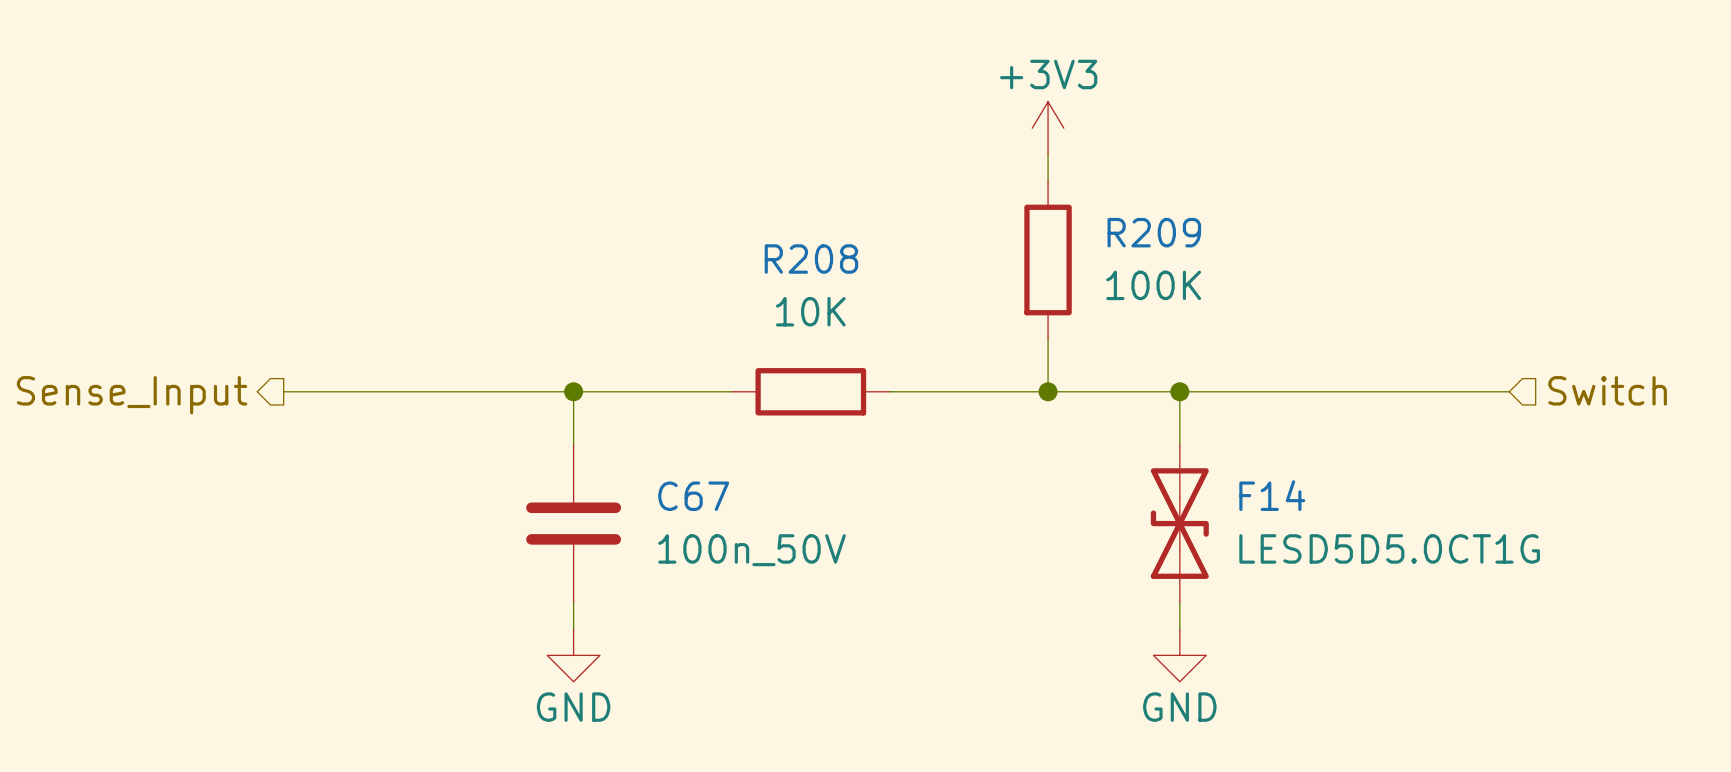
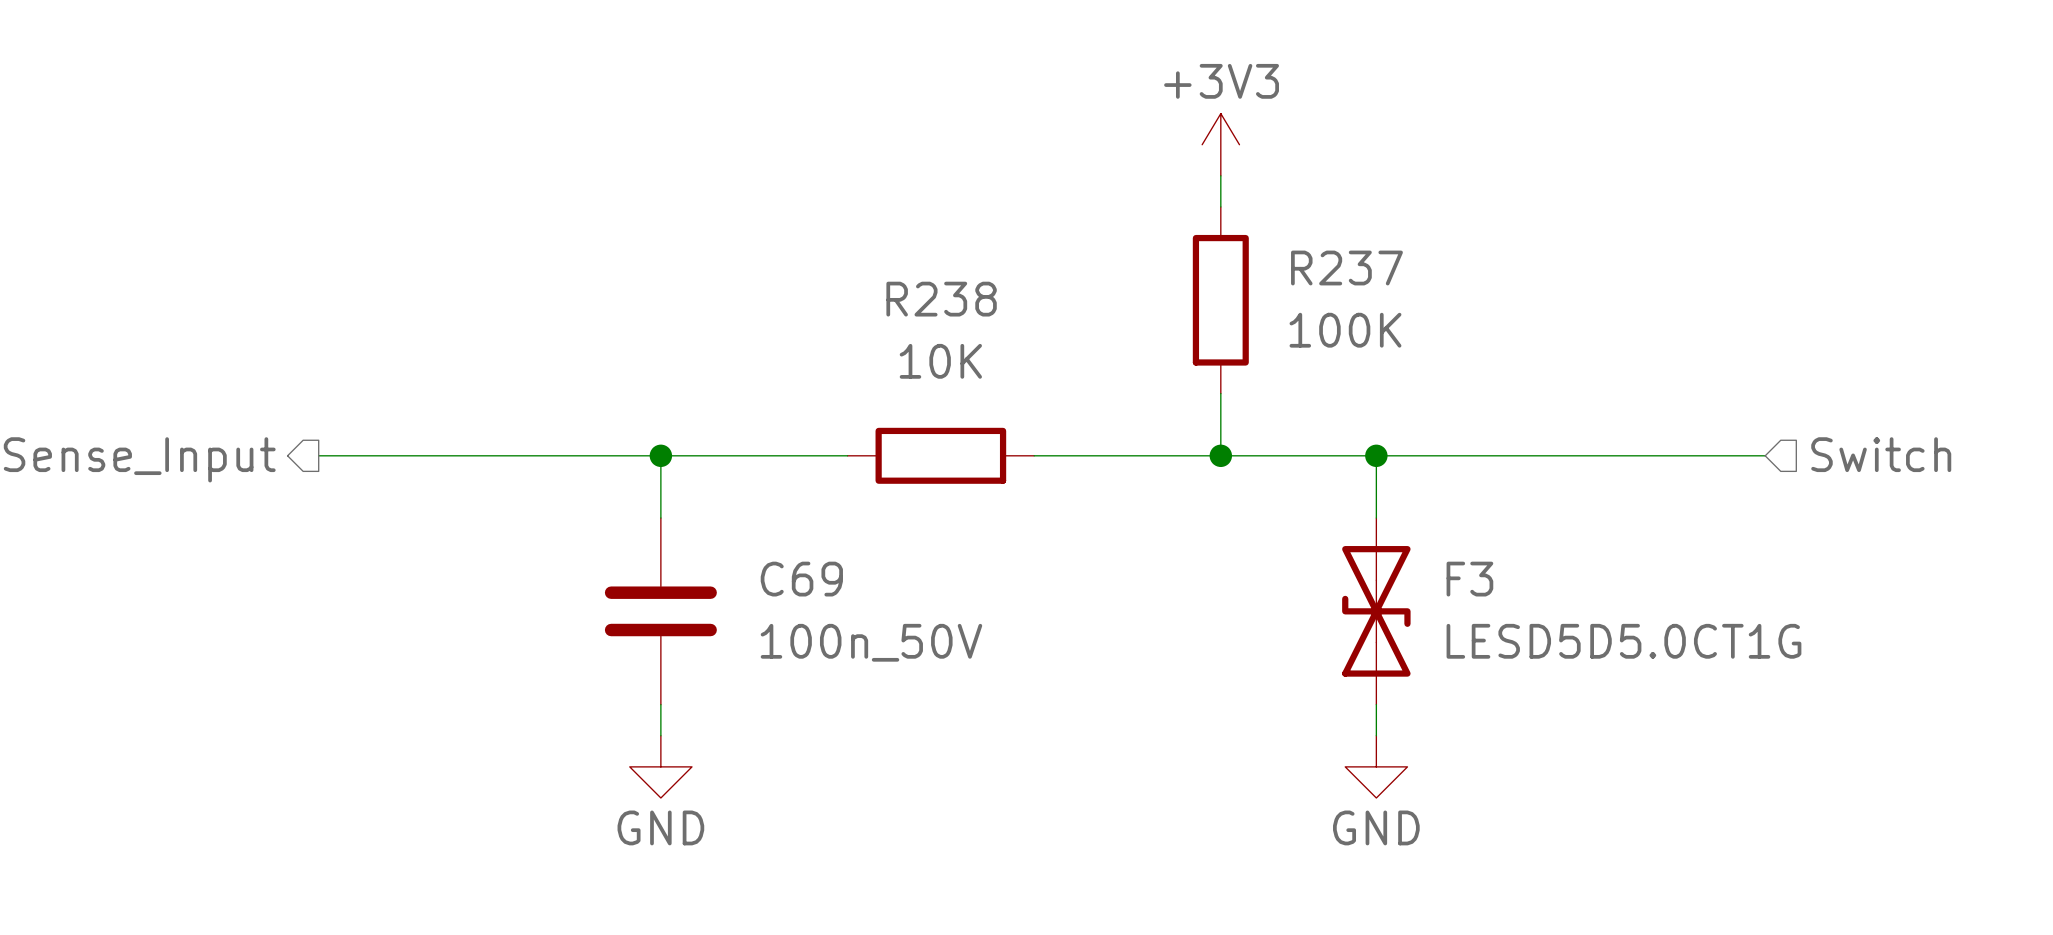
R209 name: R209 (1154, 232) -> R237 (1346, 268)
R208 name: R208 (811, 259) -> R238 (941, 299)
F14 name: F14 (1272, 495) -> F3 (1469, 579)
C67 name: C67 (693, 496) -> C69 (801, 579)

